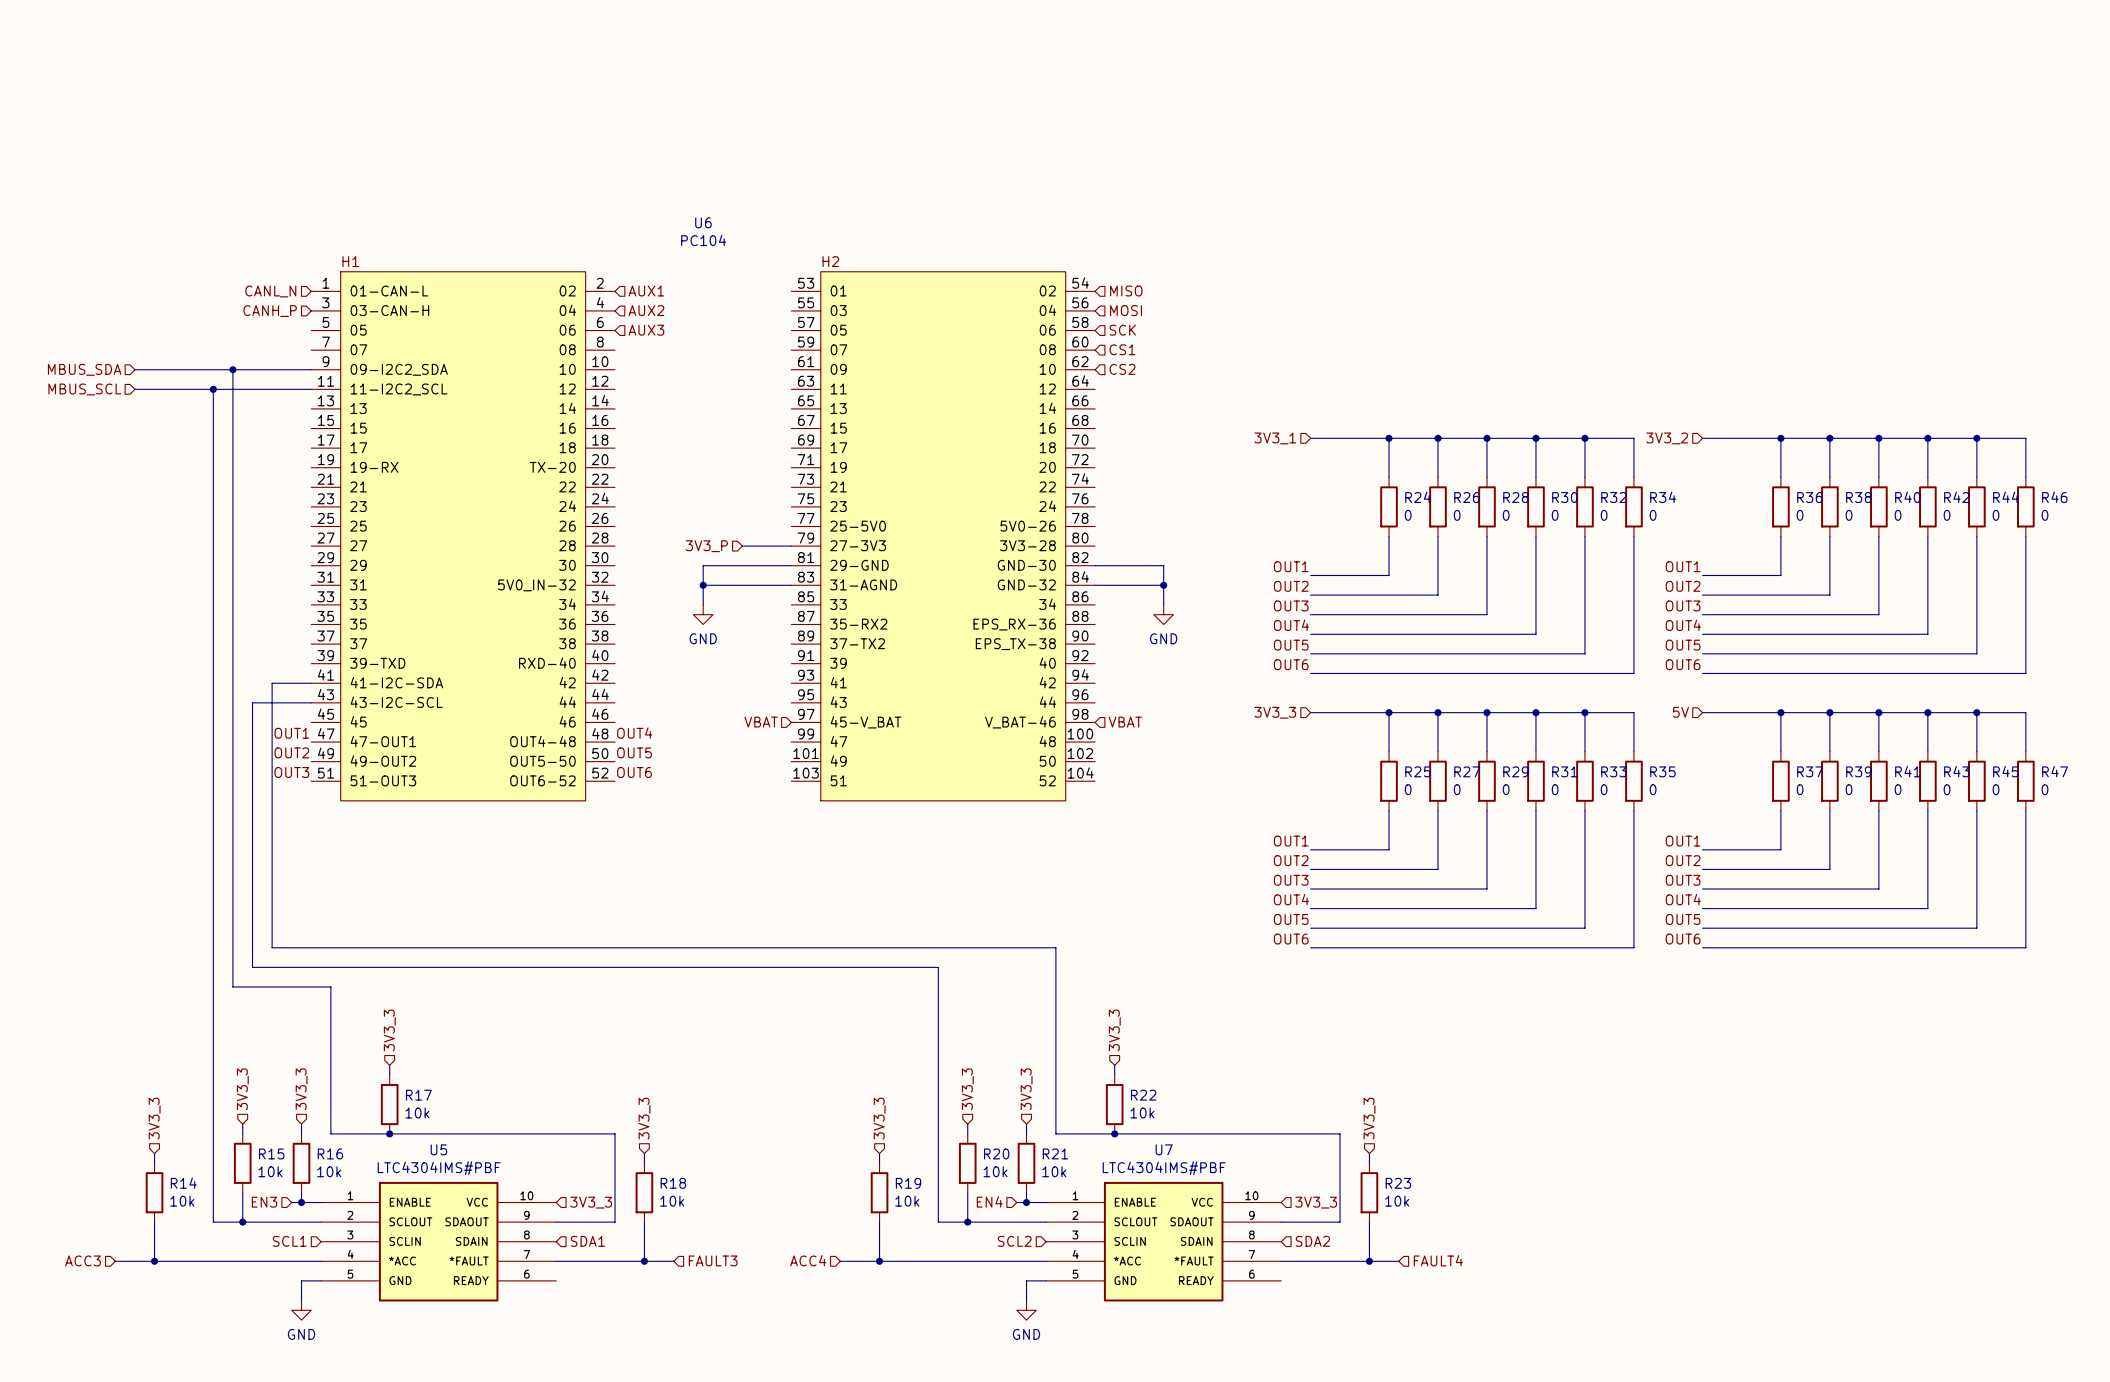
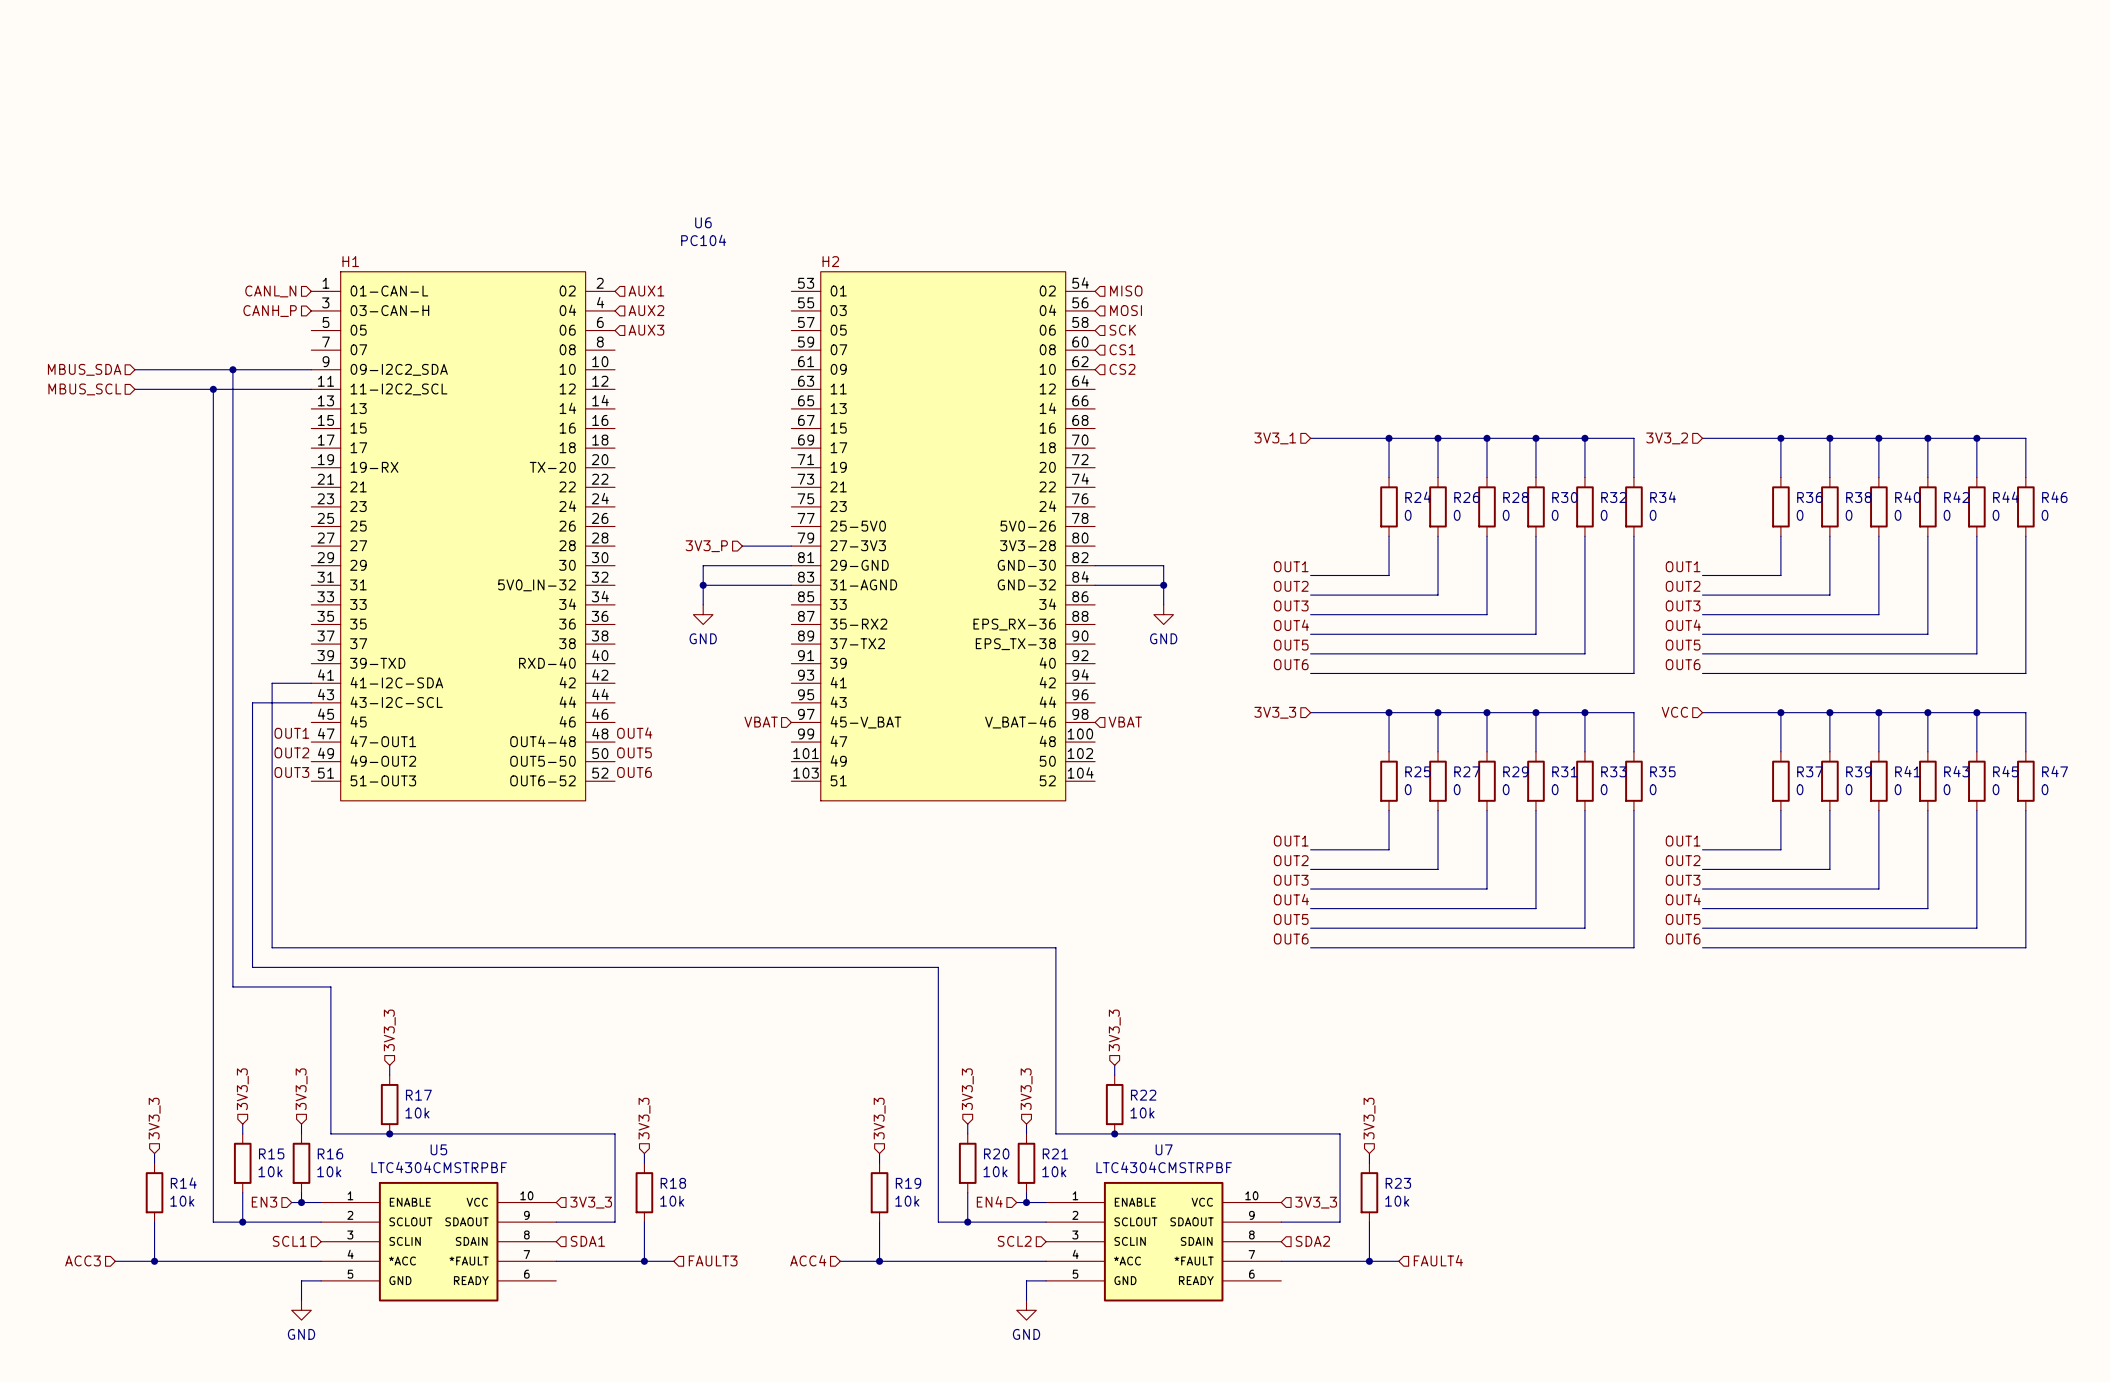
hierarchical label: 5V (1680, 712) -> VCC (1674, 712)
U5 value: LTC4304IMS#PBF (439, 1168) -> LTC4304CMSTRPBF (439, 1167)
U7 value: LTC4304IMS#PBF (1164, 1168) -> LTC4304CMSTRPBF (1164, 1167)

